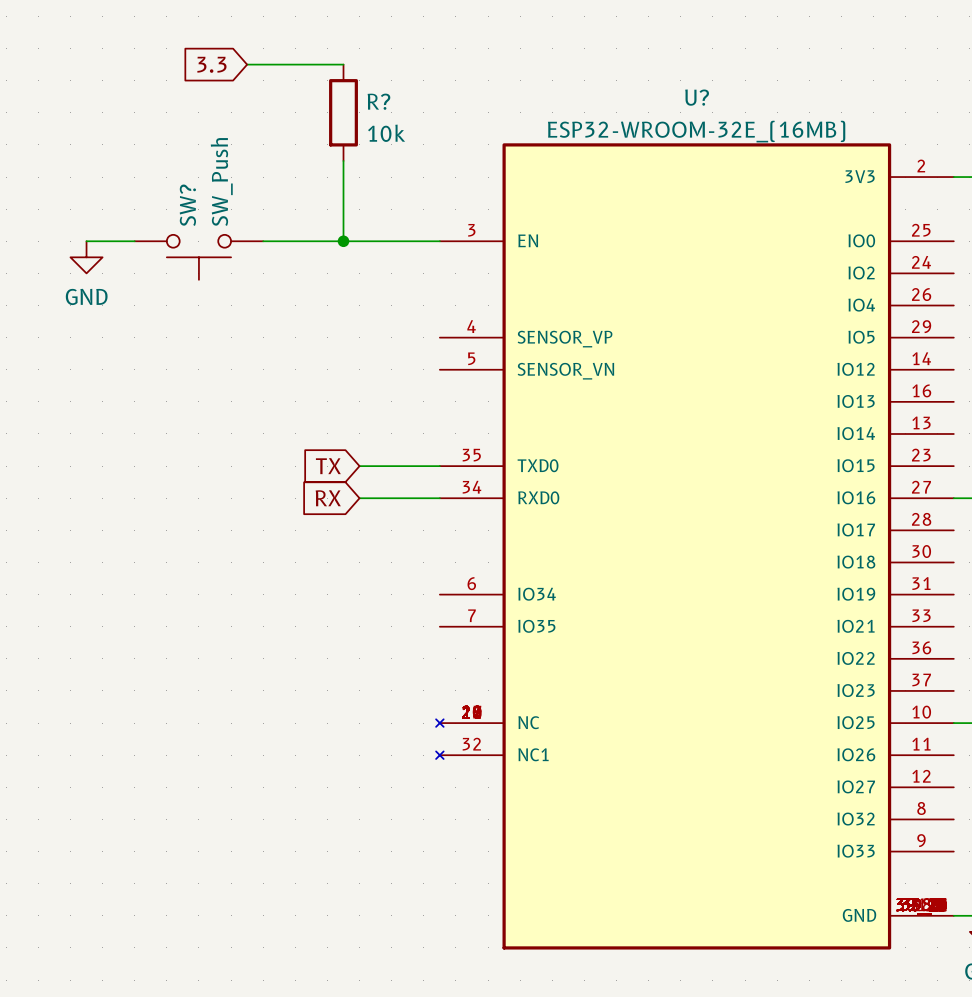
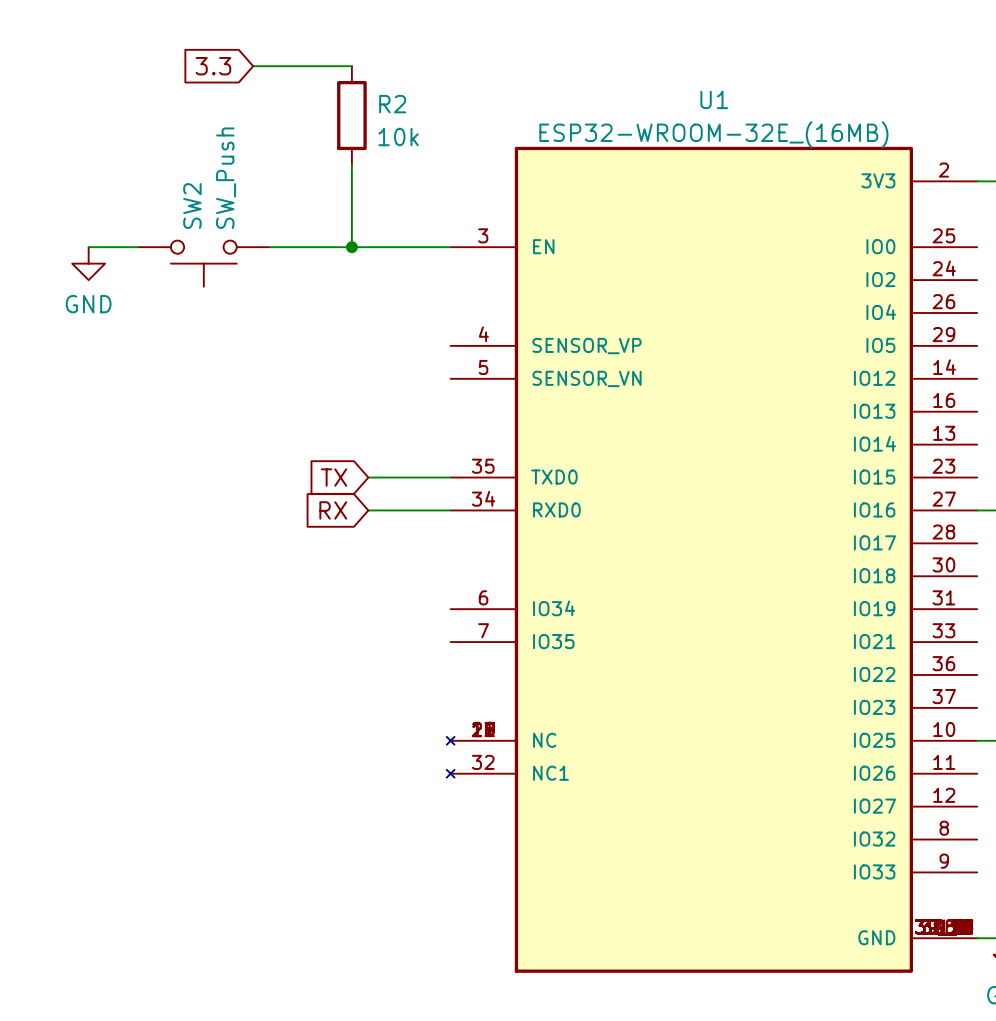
U? name: U? (697, 97) -> U1 (714, 99)
R? name: R? (378, 101) -> R2 (392, 104)
SW? name: SW? (187, 205) -> SW2 (192, 206)

